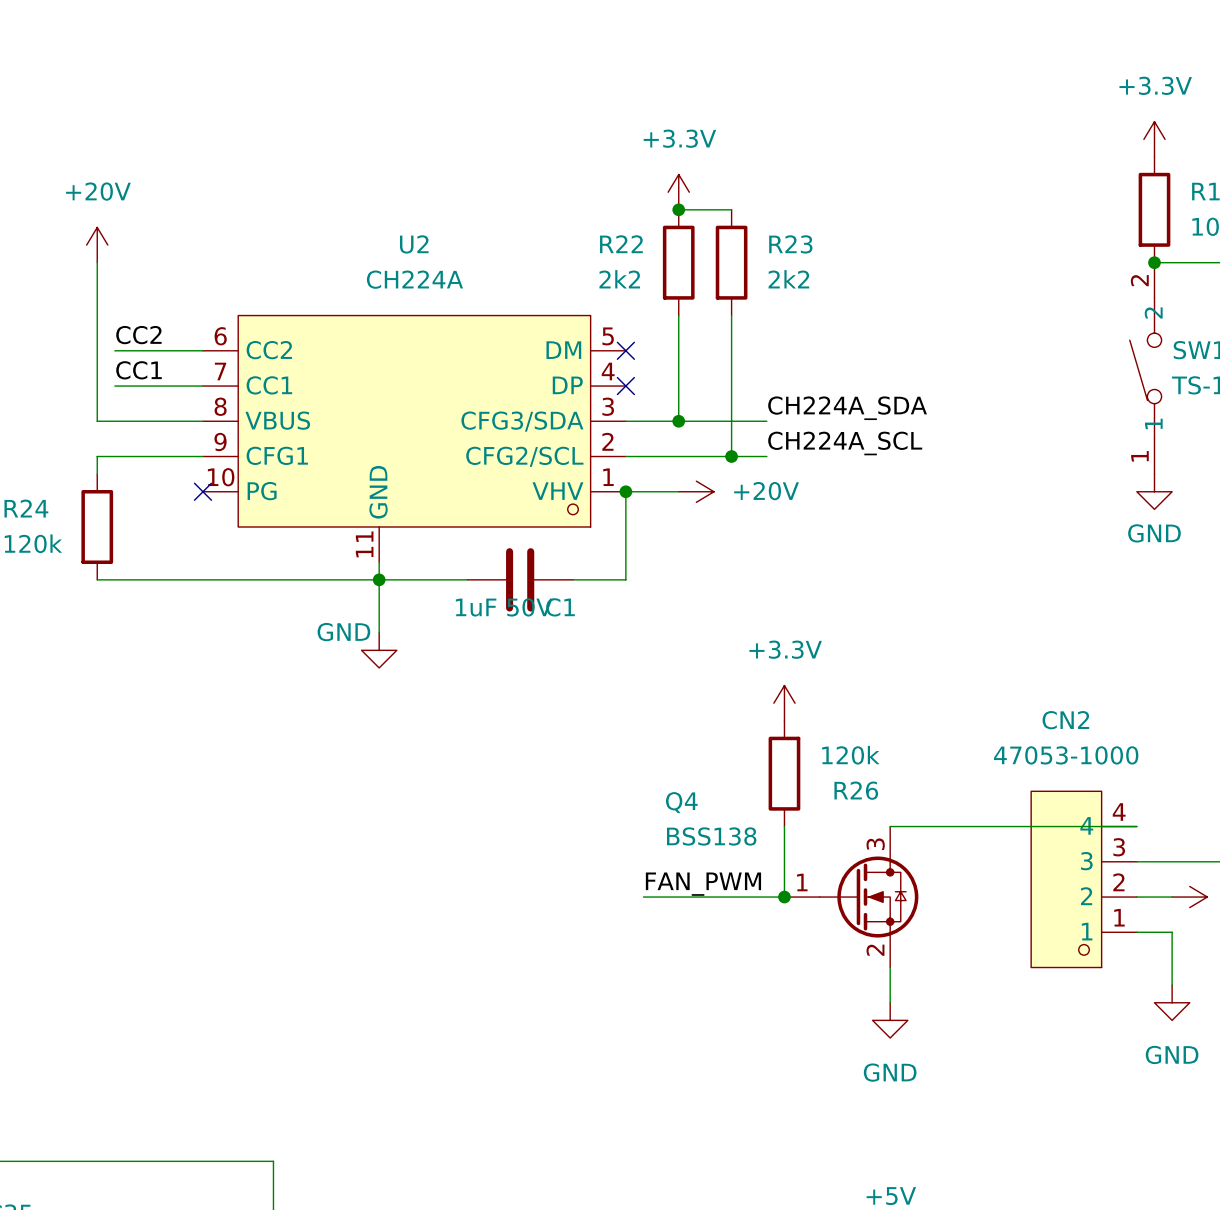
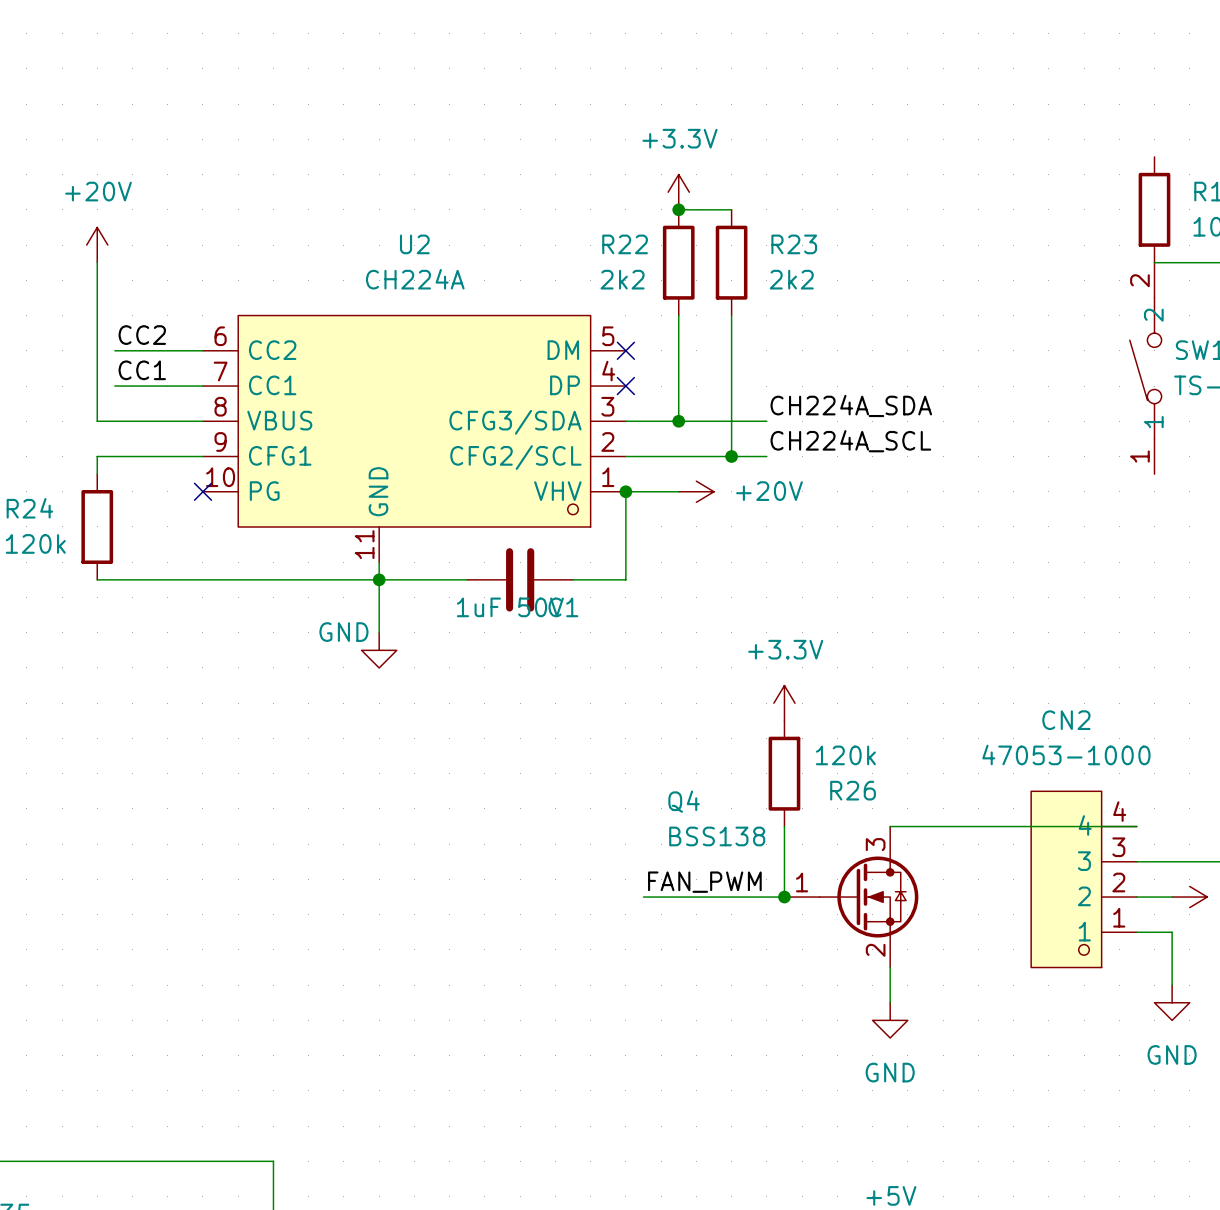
power symbol: +3.3V (1154, 139) -> none
junction: (1154, 262) -> none
power symbol: GND (1154, 491) -> none

